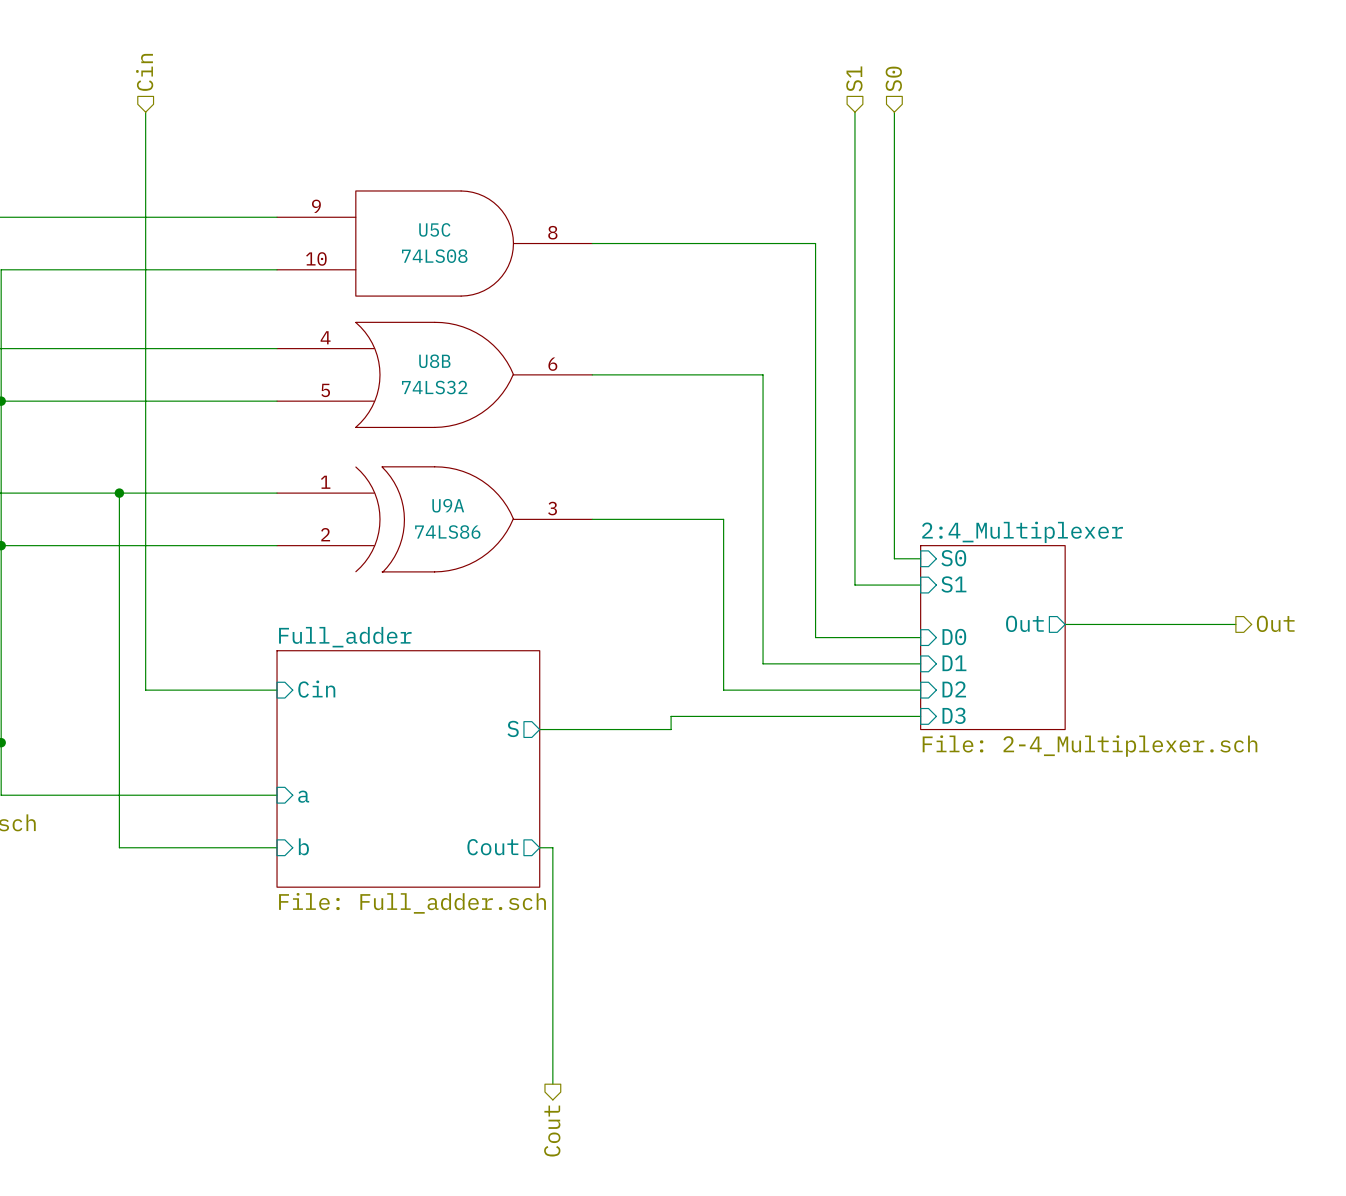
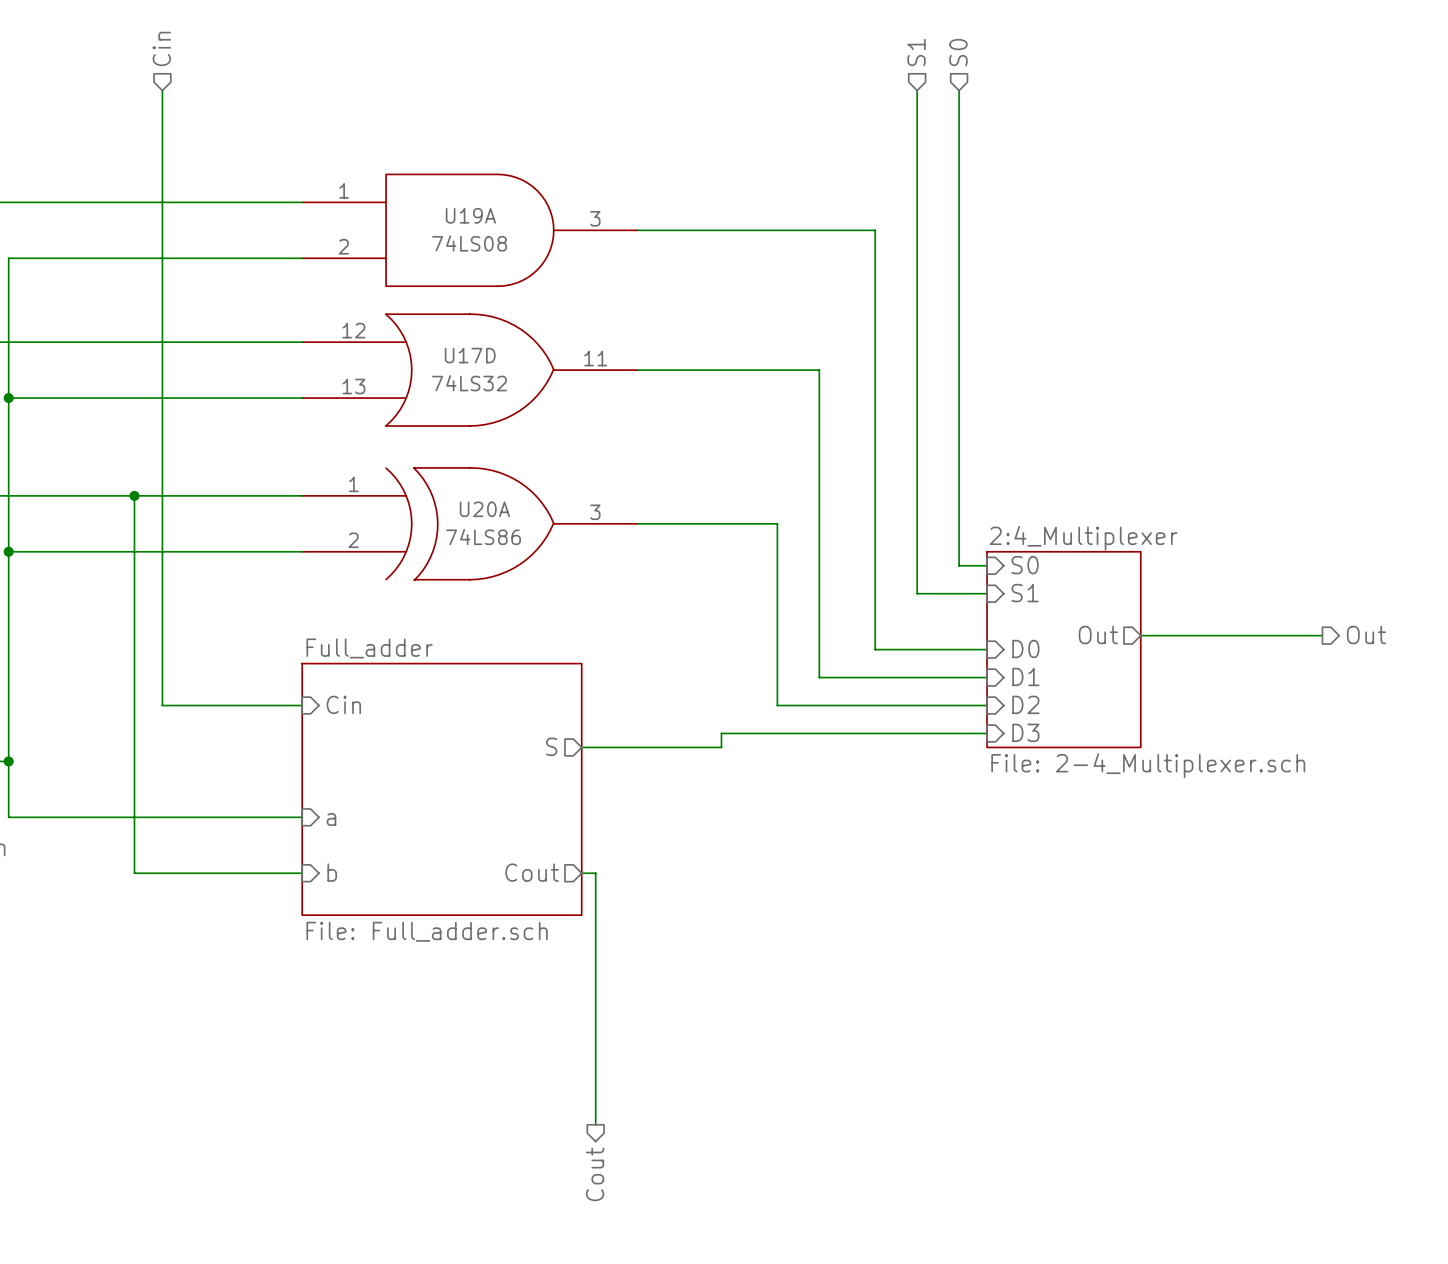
U5C pin number: 9 (316, 206) -> 1 (344, 190)
U5C name: U5C (434, 229) -> U19A (470, 215)
U5C pin number: 8 (552, 232) -> 3 (595, 218)
U5C pin number: 10 (316, 258) -> 2 (343, 246)
U8B pin number: 4 (325, 337) -> 12 (353, 330)
U8B name: U8B (434, 361) -> U17D (470, 355)
U8B pin number: 6 (552, 364) -> 11 (595, 358)
U8B pin number: 5 (325, 390) -> 13 (353, 386)
U9A name: U9A (448, 505) -> U20A (484, 509)

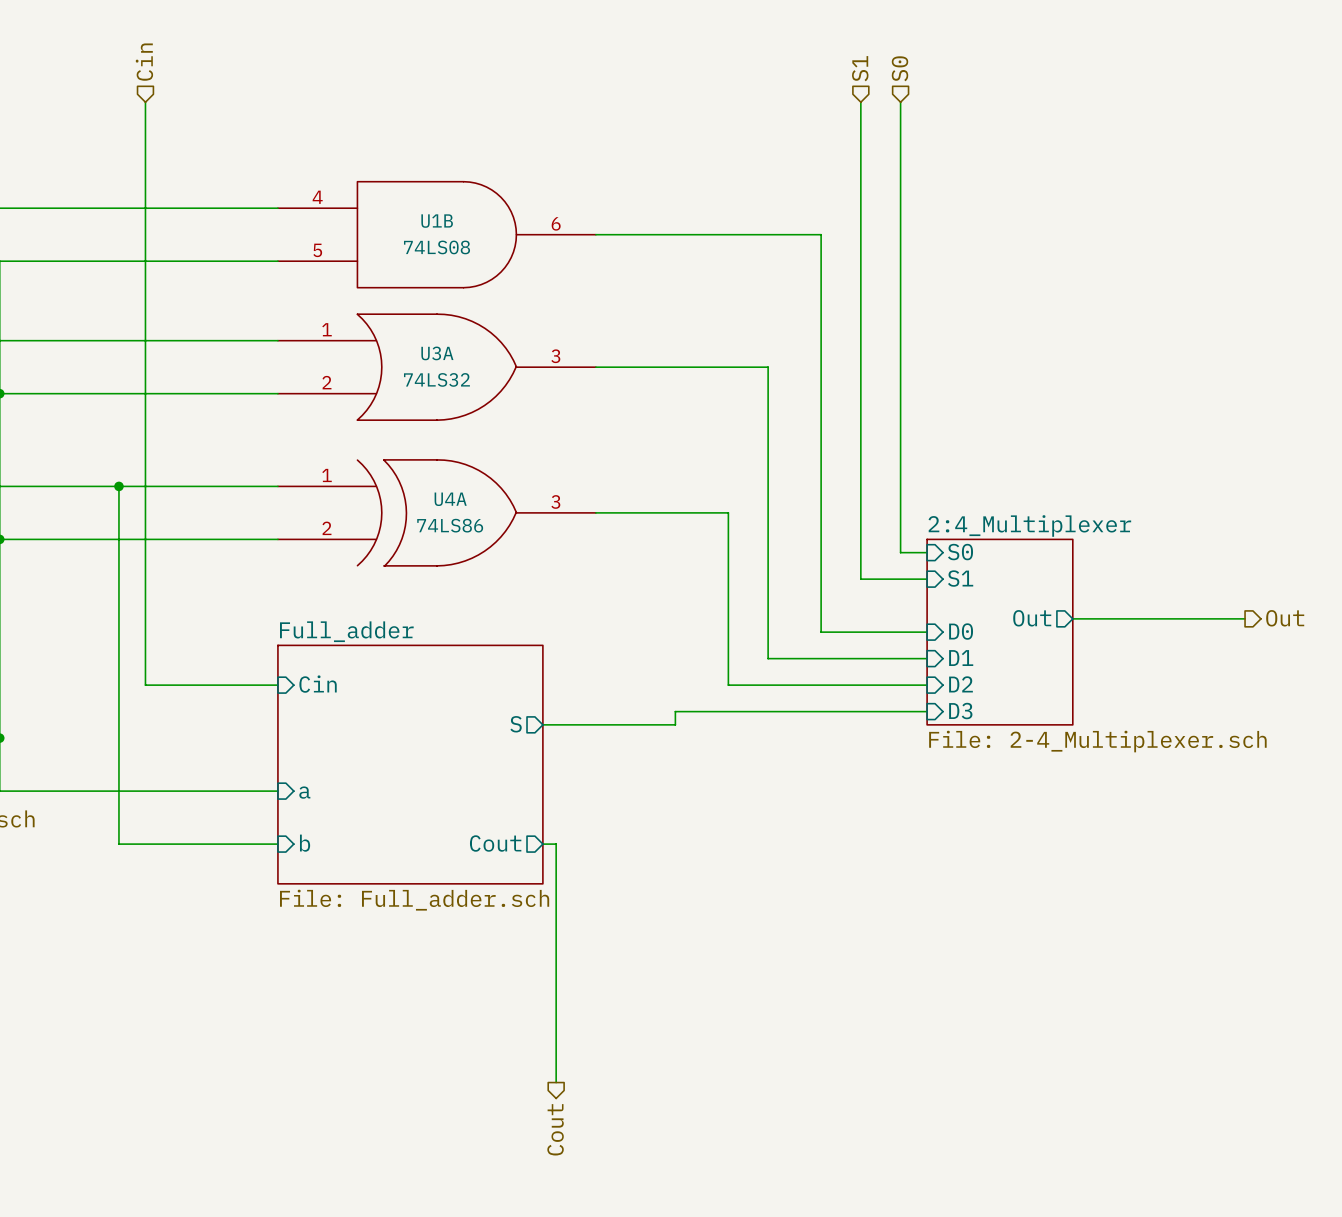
U19A pin number: 1 (344, 190) -> 4 (317, 197)
U19A name: U19A (470, 215) -> U1B (437, 221)
U19A pin number: 3 (595, 218) -> 6 (556, 223)
U19A pin number: 2 (343, 246) -> 5 (317, 250)
U17D pin number: 12 (353, 330) -> 1 (327, 329)
U17D name: U17D (470, 355) -> U3A (437, 353)
U17D pin number: 11 (595, 358) -> 3 (555, 356)
U17D pin number: 13 (353, 386) -> 2 (326, 382)
U20A name: U20A (484, 509) -> U4A (450, 499)

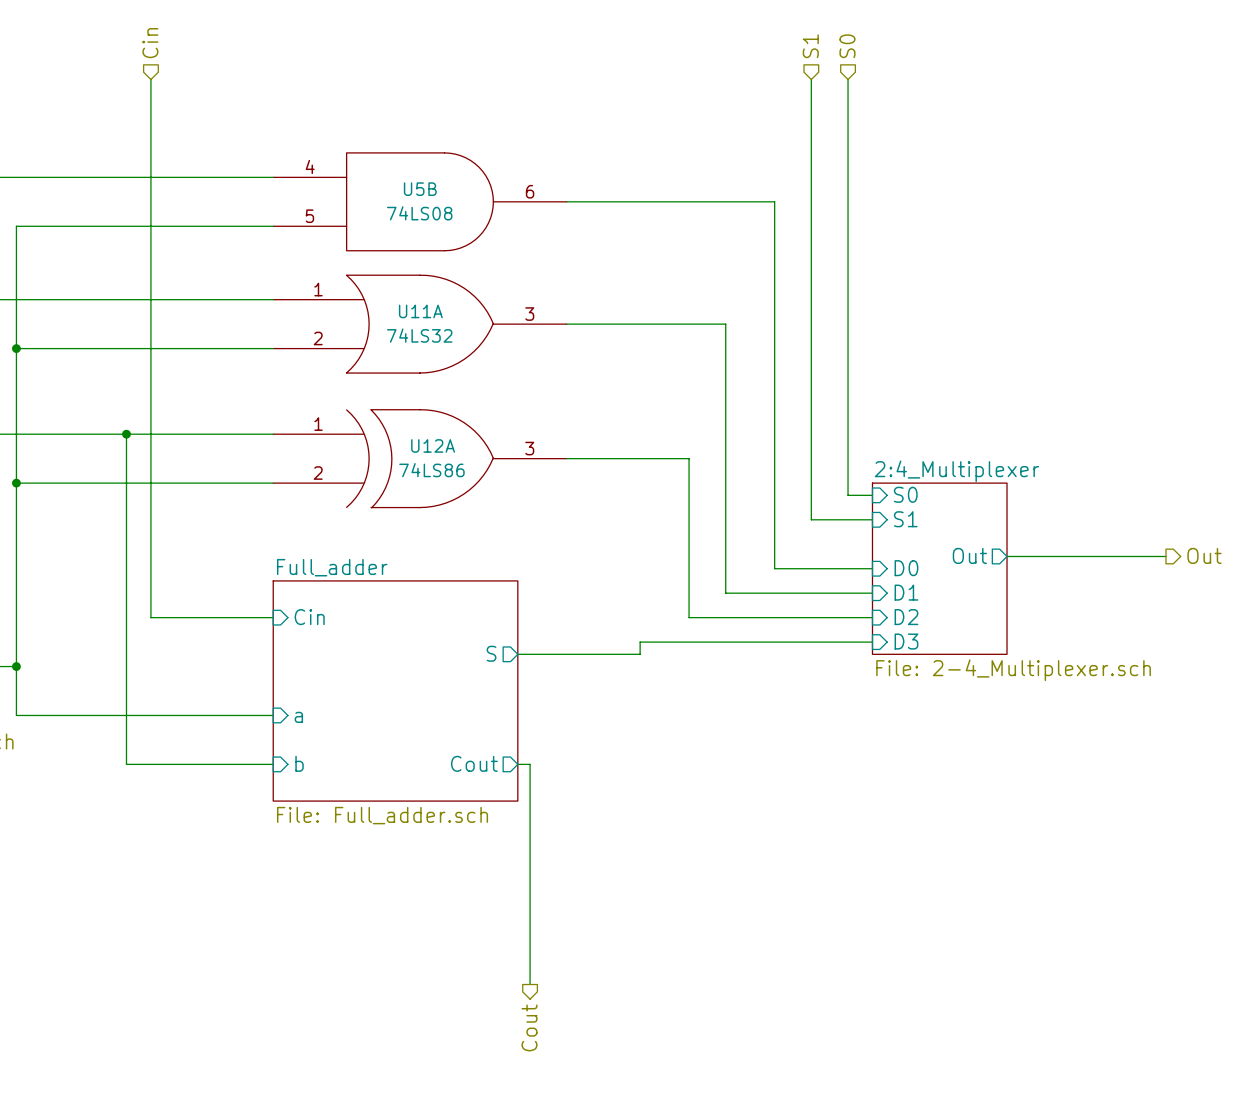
U1B name: U1B (437, 221) -> U5B (420, 189)
U3A name: U3A (437, 353) -> U11A (420, 311)
U4A name: U4A (450, 499) -> U12A (433, 445)

